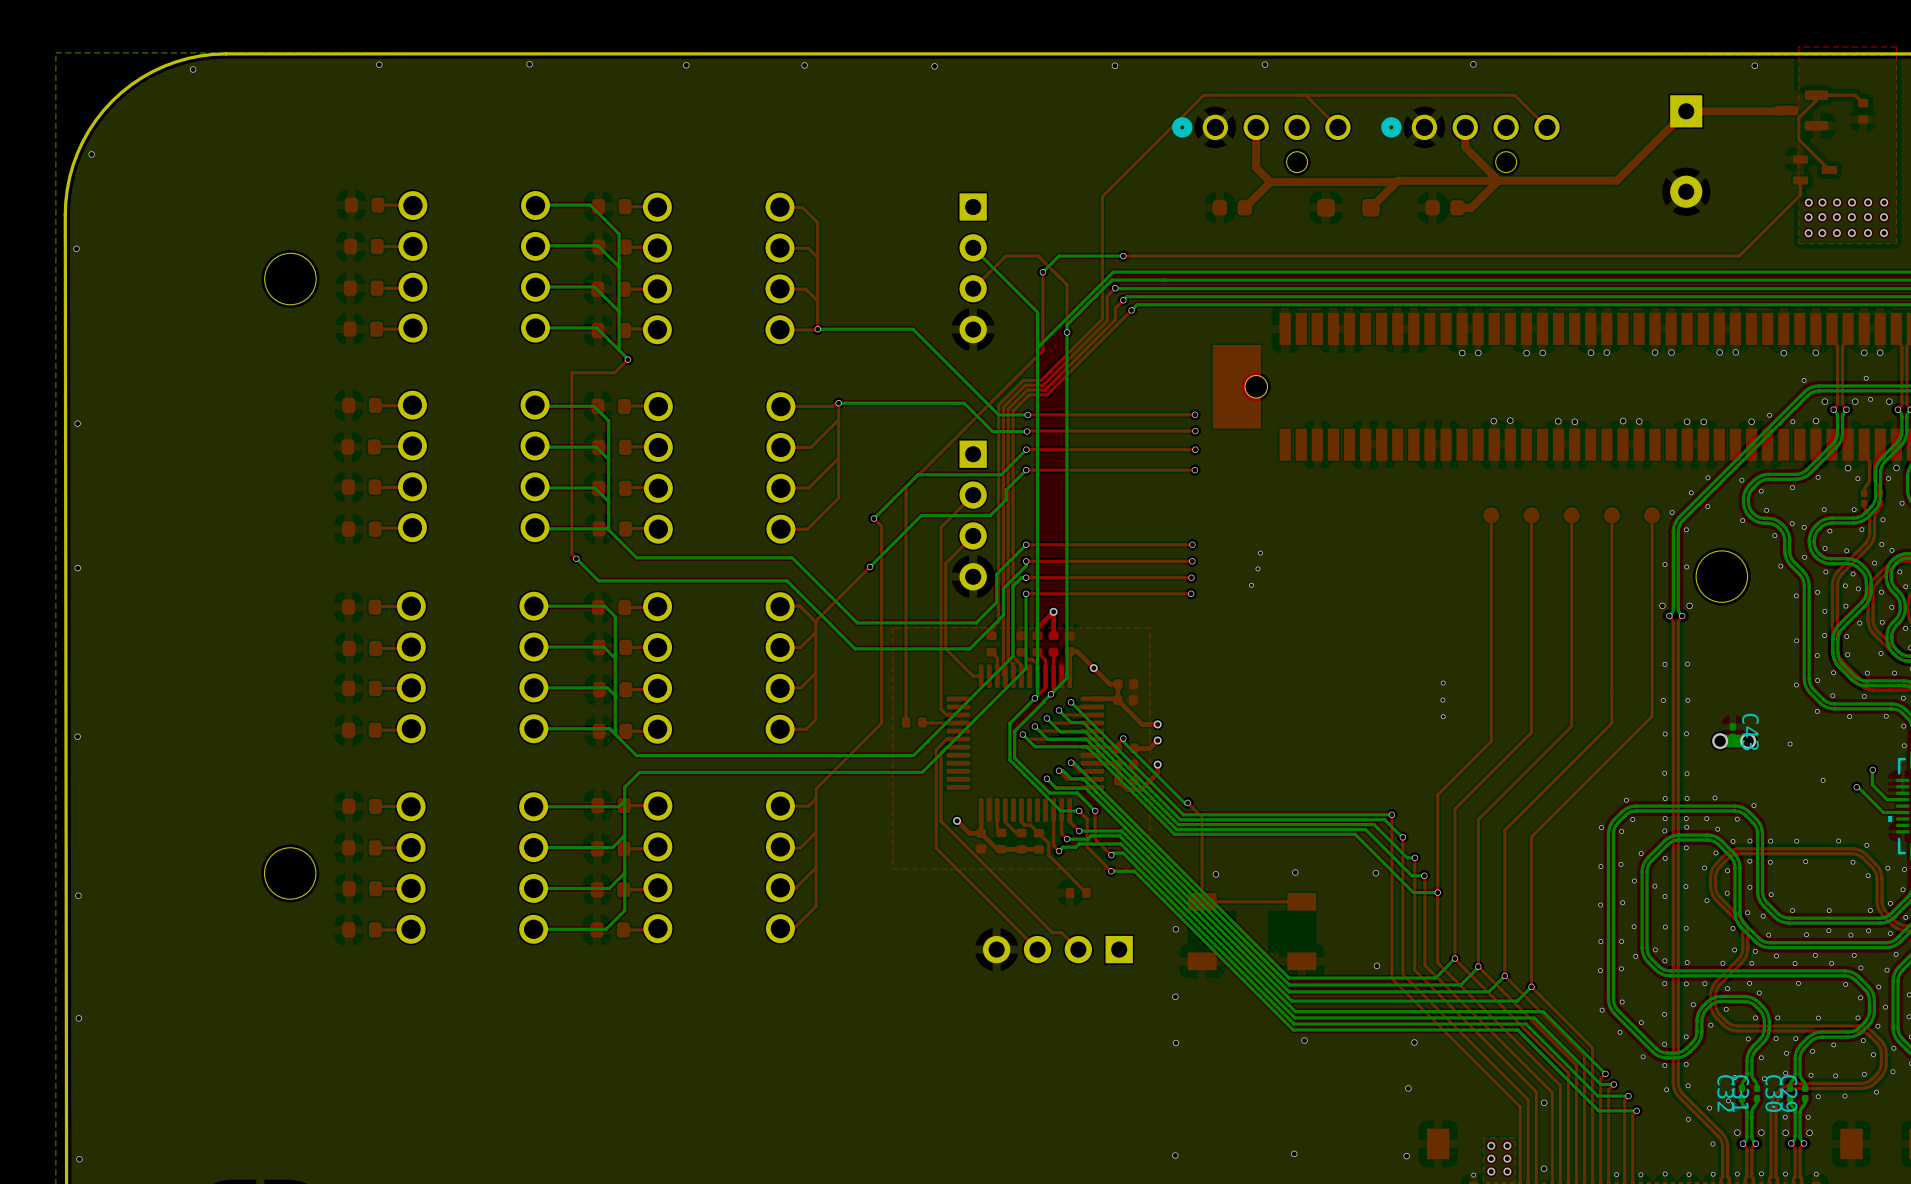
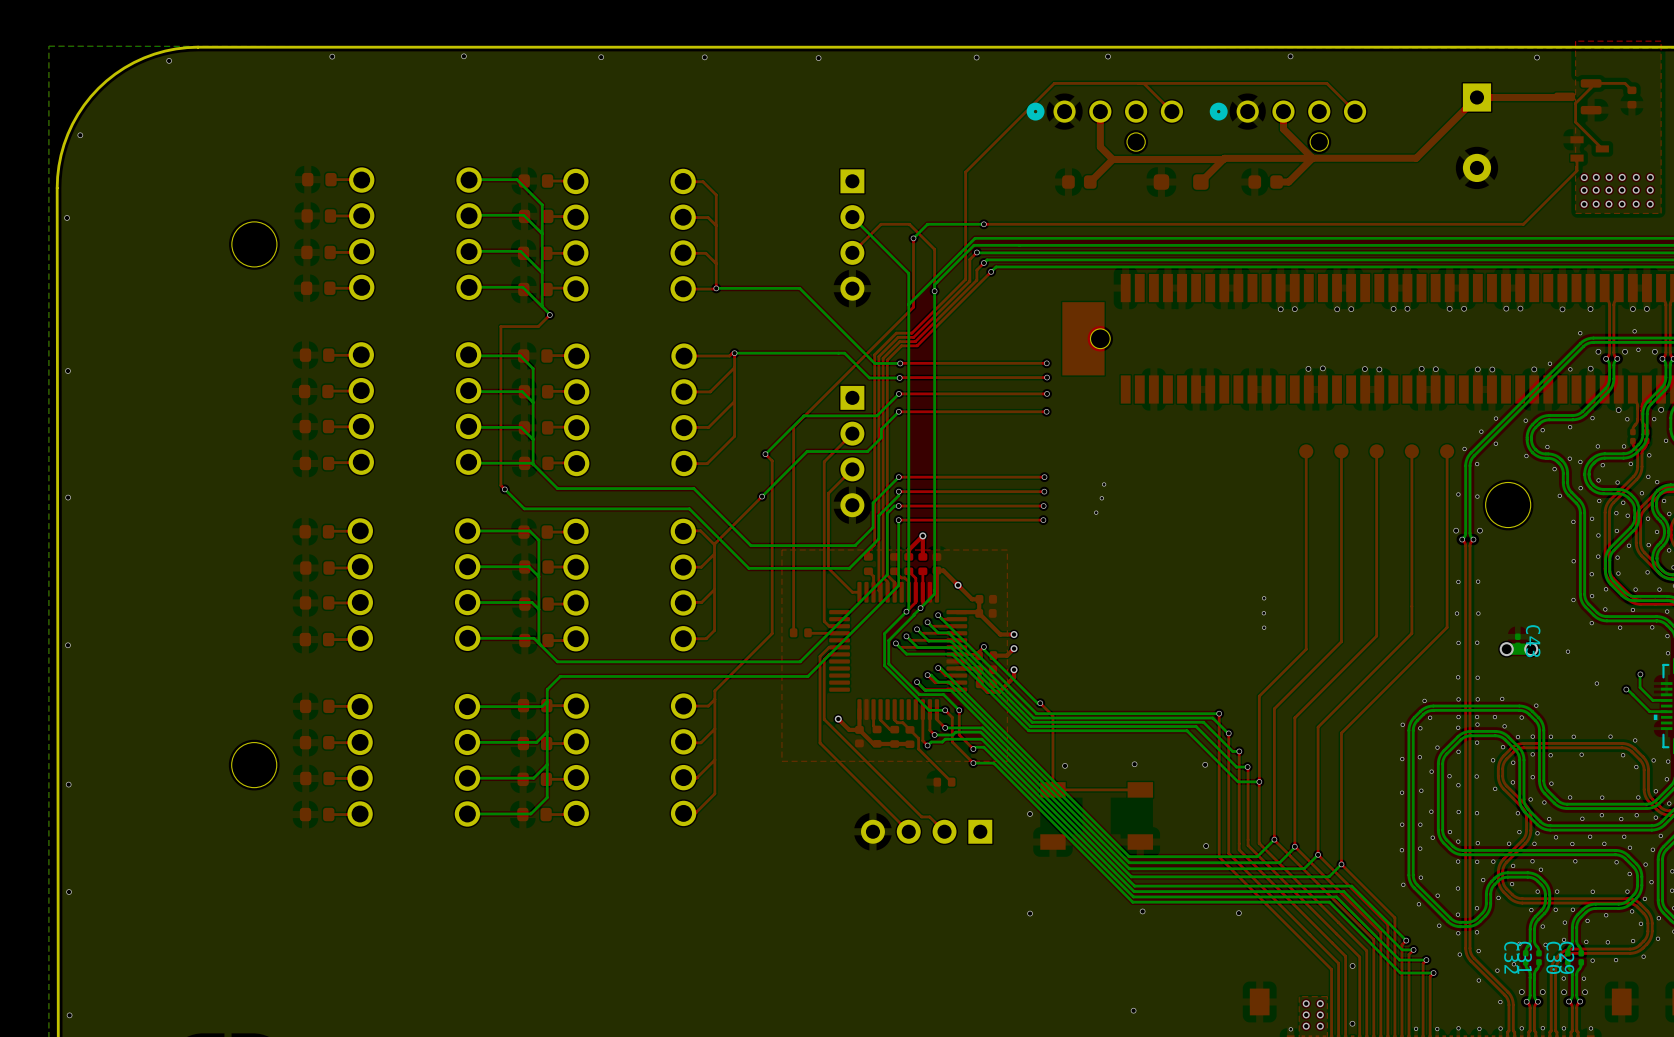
via: (1175, 996) -> none
via: (1408, 1088) -> none
via: (1175, 1155) -> none
via: (1406, 1156) -> none

